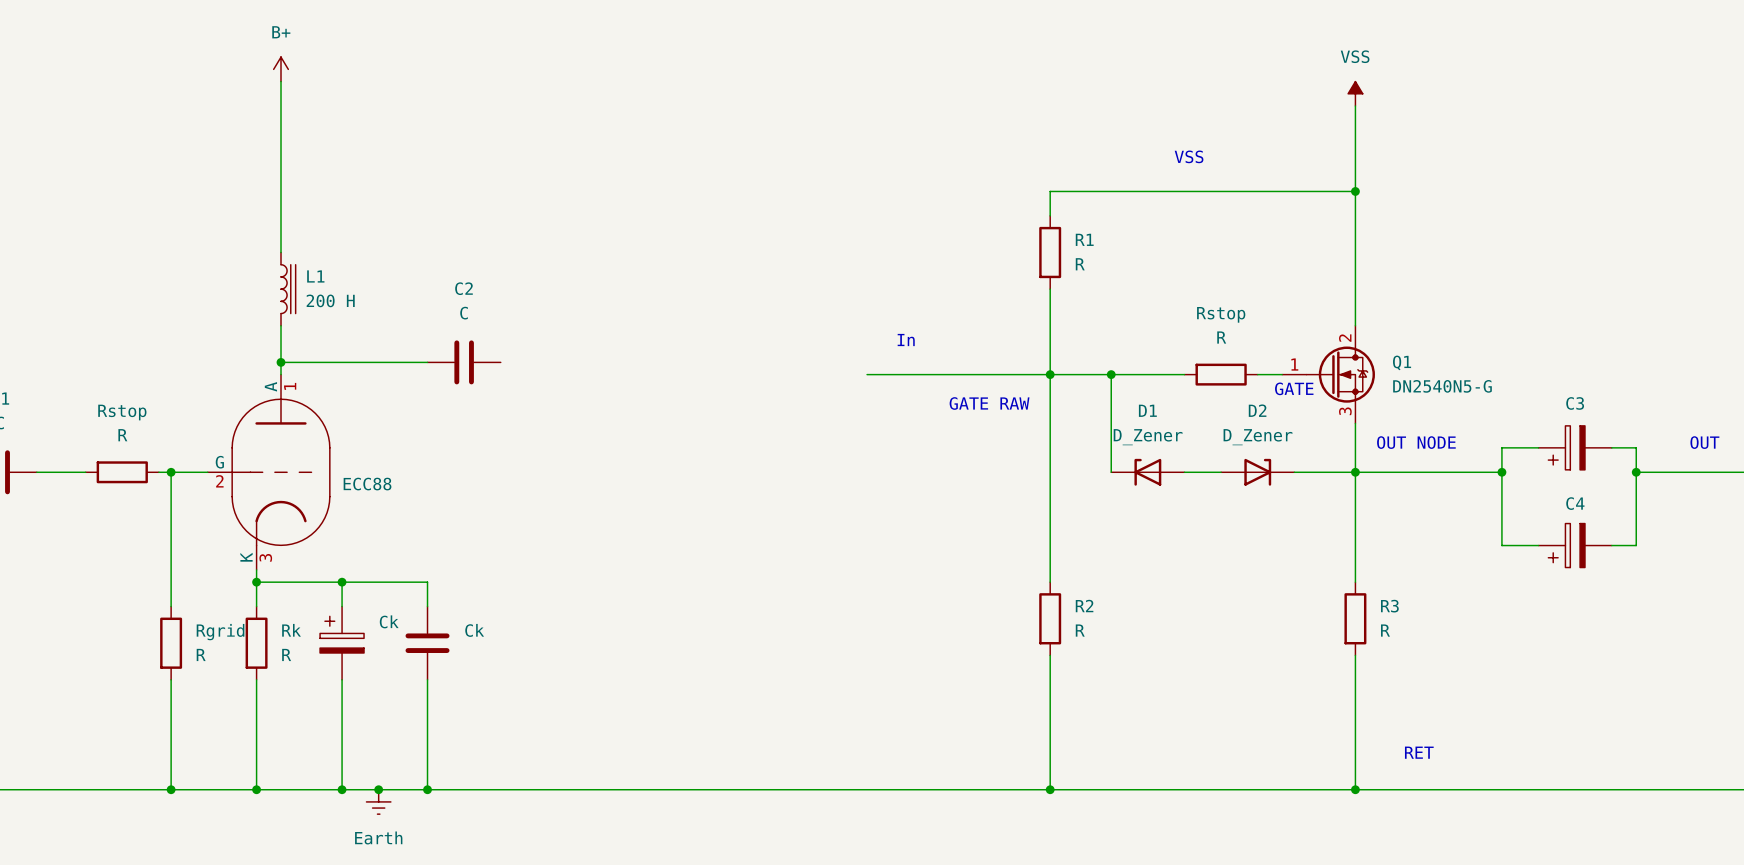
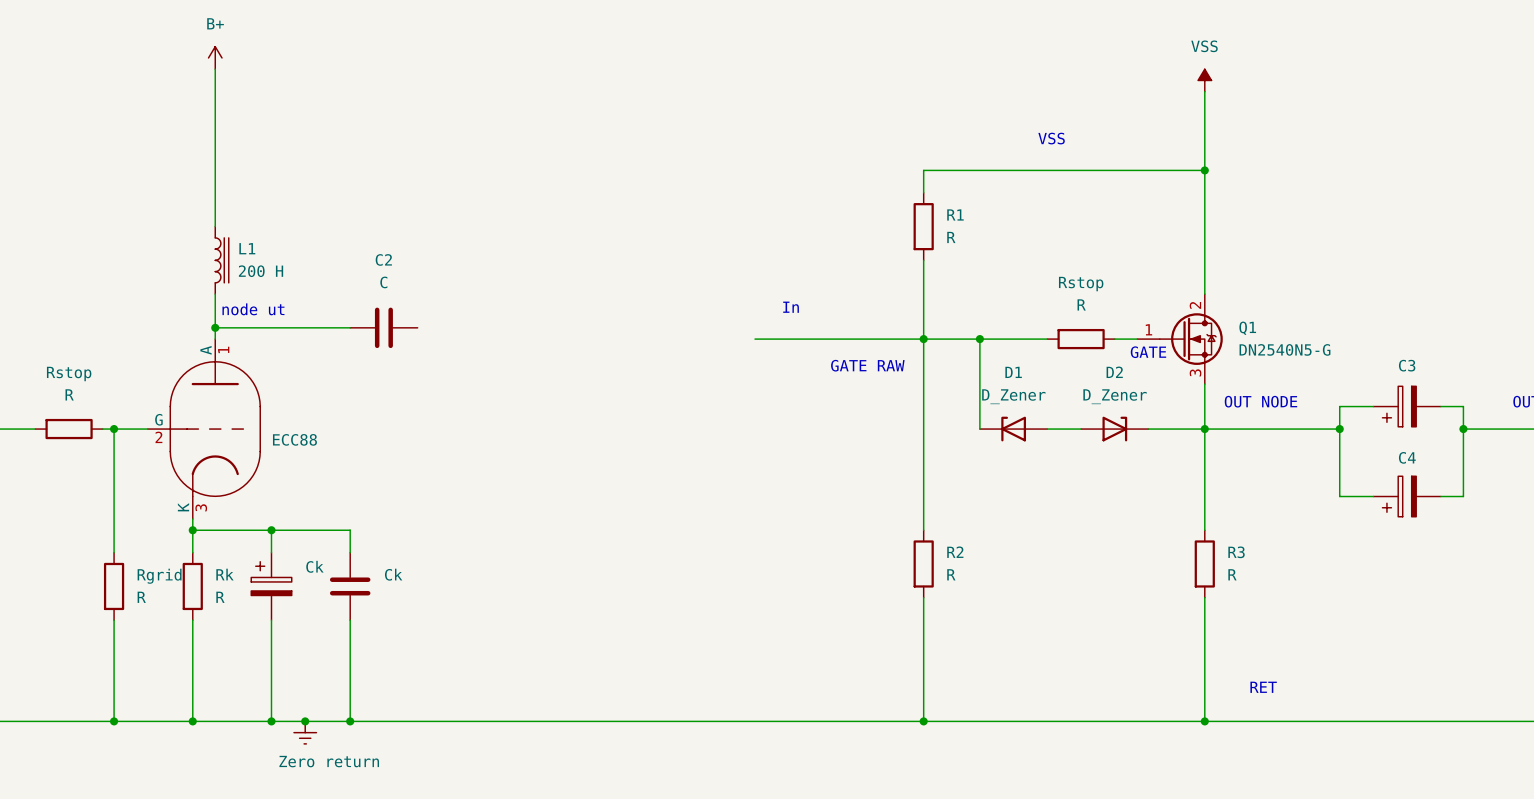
text: none -> node ut (253, 309)
power symbol: Earth (378, 801) -> Zero return (305, 732)

